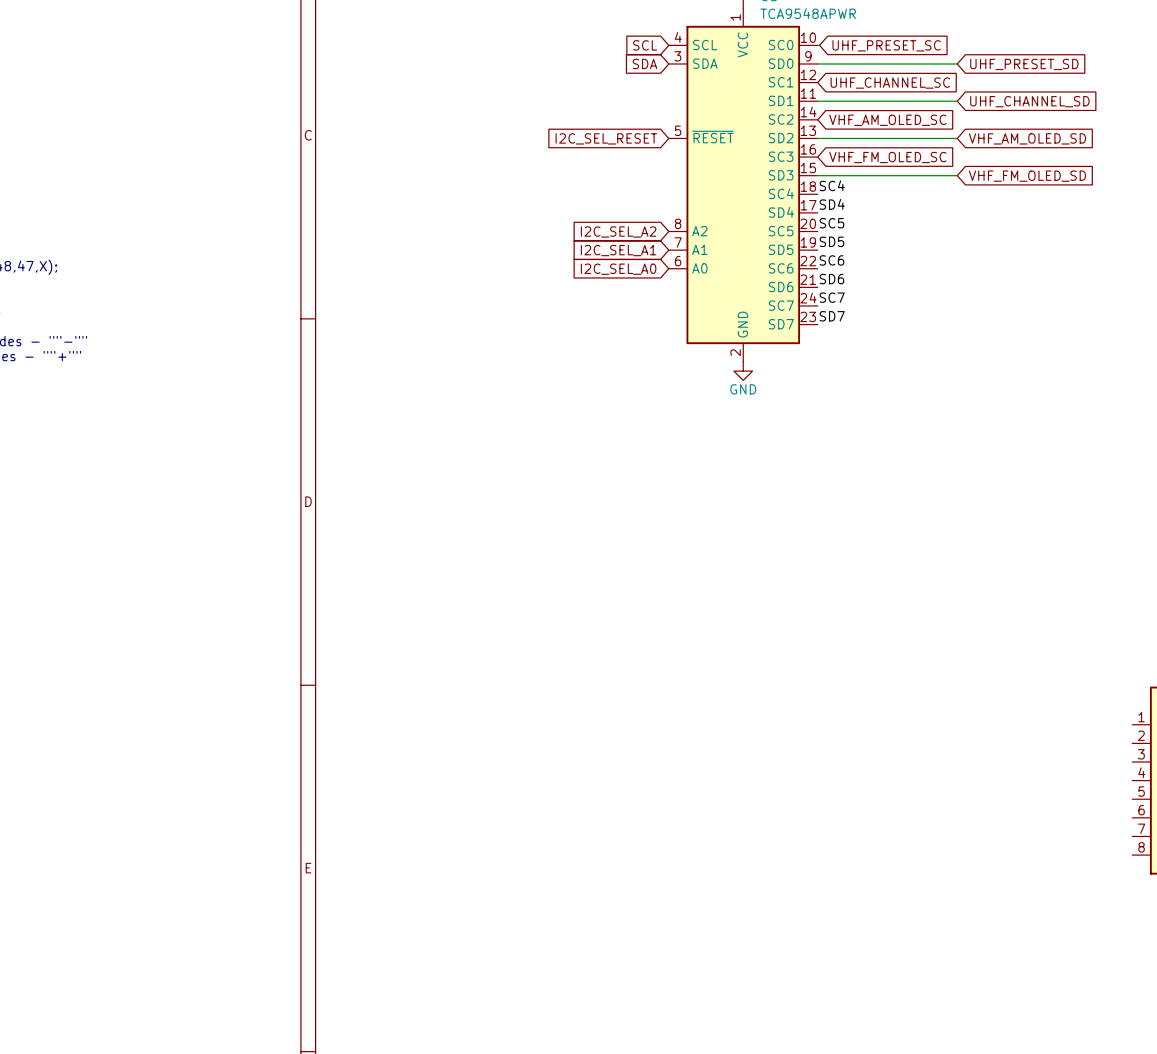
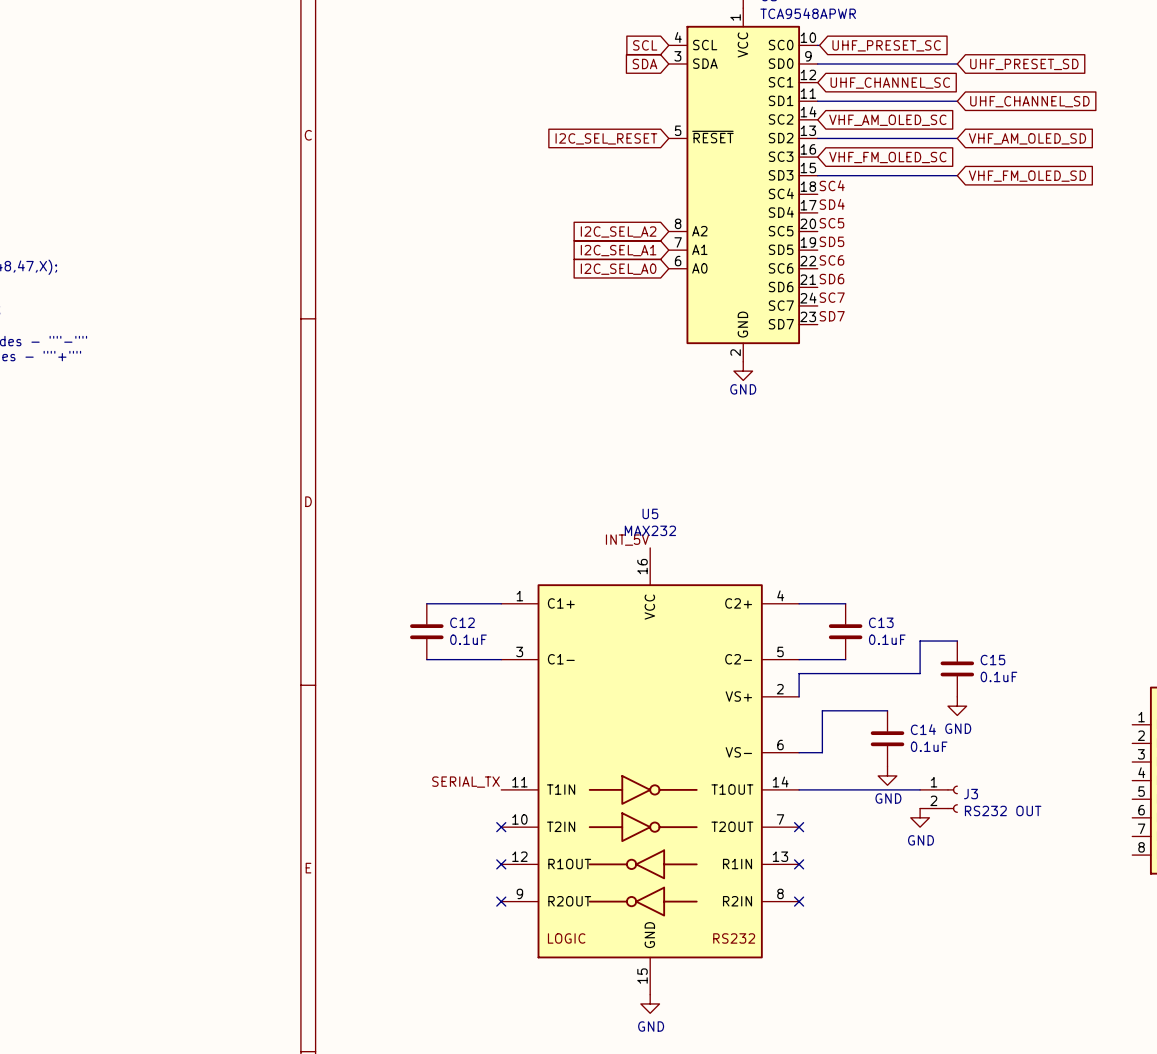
label: none -> INT_5V (627, 540)
wire: none -> (426, 603) (501, 603)
wire: none -> (799, 603) (845, 603)
C12: none -> 0.1uF (426, 631)
C13: none -> 0.1uF (845, 631)
wire: none -> (957, 641) (920, 641) (920, 673) (799, 673) (799, 696)
wire: none -> (426, 659) (501, 659)
wire: none -> (799, 659) (845, 659)
C15: none -> 0.1uF (957, 668)
power symbol: none -> GND (957, 706)
wire: none -> (887, 710) (822, 710) (822, 752) (799, 752)
C14: none -> 0.1uF (887, 738)
U5: none -> MAX232 (650, 771)
power symbol: none -> GND (887, 775)
label: none -> SERIAL_TX (465, 782)
wire: none -> (799, 789) (920, 789)
J3: none -> RS232 OUT (938, 799)
power symbol: none -> GND (920, 817)
no-connect mark: none -> (501, 827)
no-connect mark: none -> (799, 827)
no-connect mark: none -> (501, 864)
no-connect mark: none -> (799, 864)
no-connect mark: none -> (501, 901)
no-connect mark: none -> (799, 901)
power symbol: none -> GND (650, 1003)

